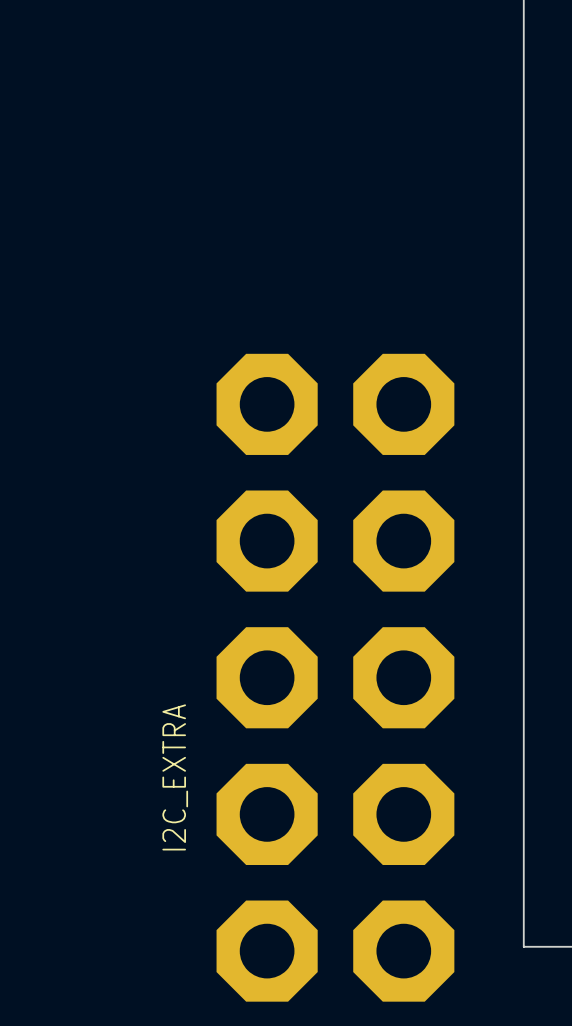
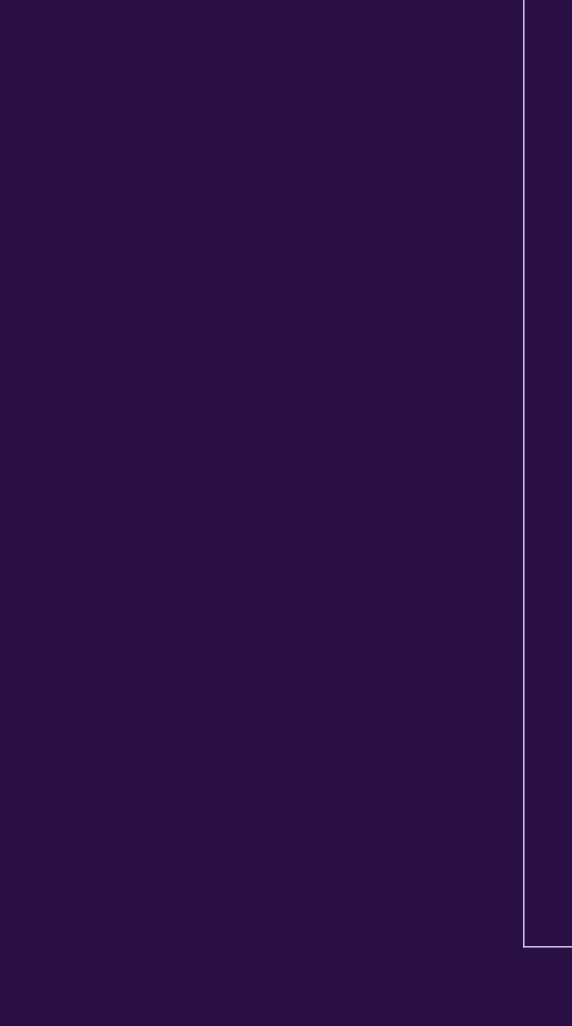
I2C_EXTRA: (335, 677) -> none

